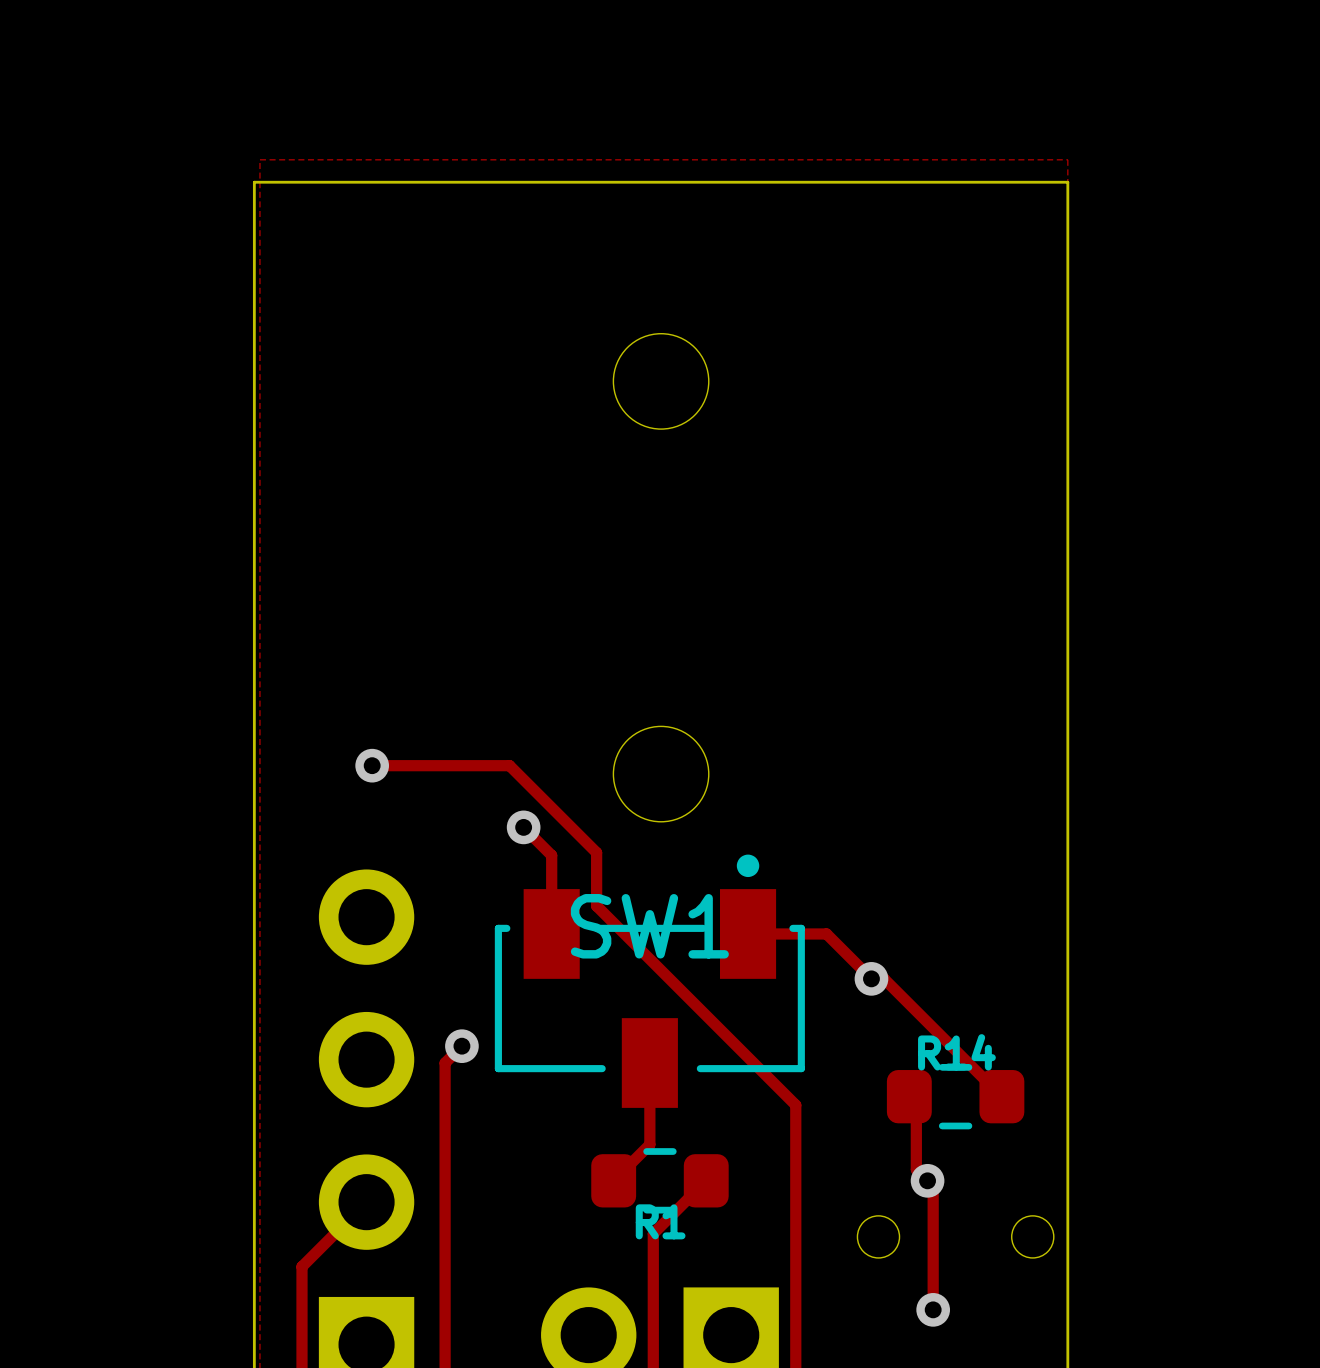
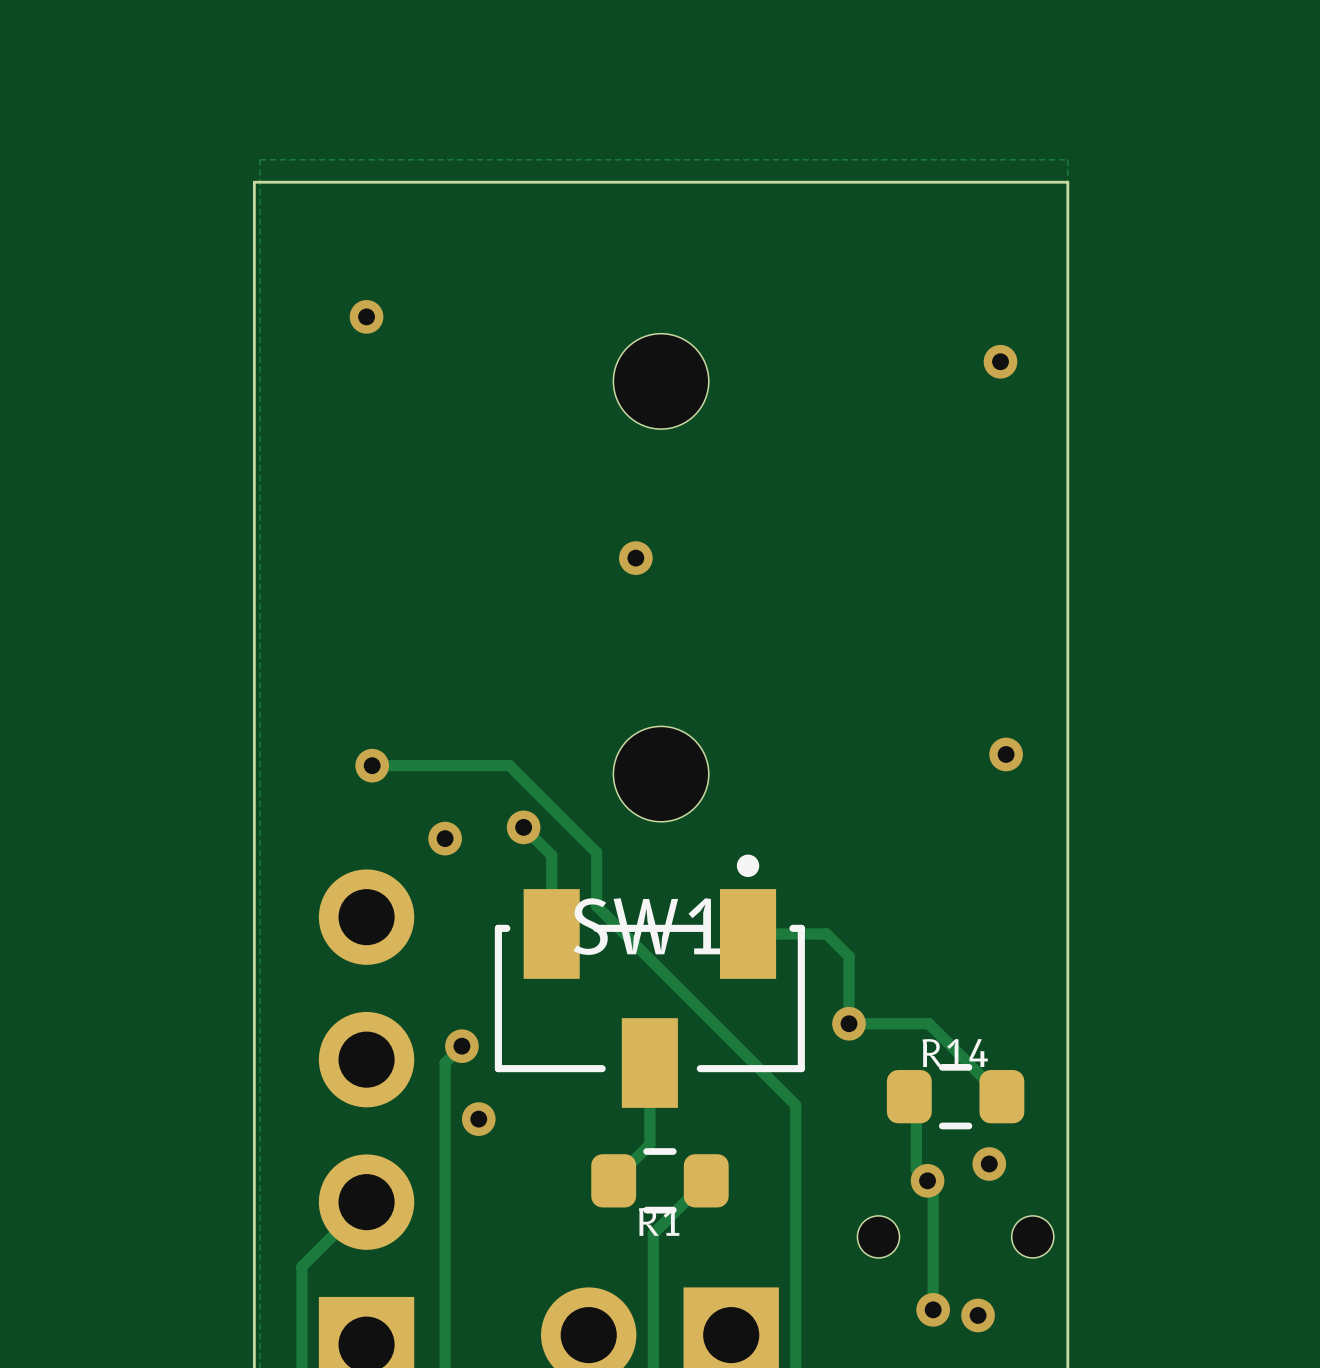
via: none -> (366, 316)
via: none -> (1000, 361)
via: none -> (635, 558)
via: none -> (1006, 754)
via: none -> (445, 838)
track: (849, 956) (871, 978) (884, 978) (928, 1023) -> (849, 956) (849, 1023) (928, 1023)
via: (871, 978) -> none
via: none -> (849, 1023)
via: none -> (478, 1119)
via: none -> (989, 1163)
via: none -> (978, 1315)

